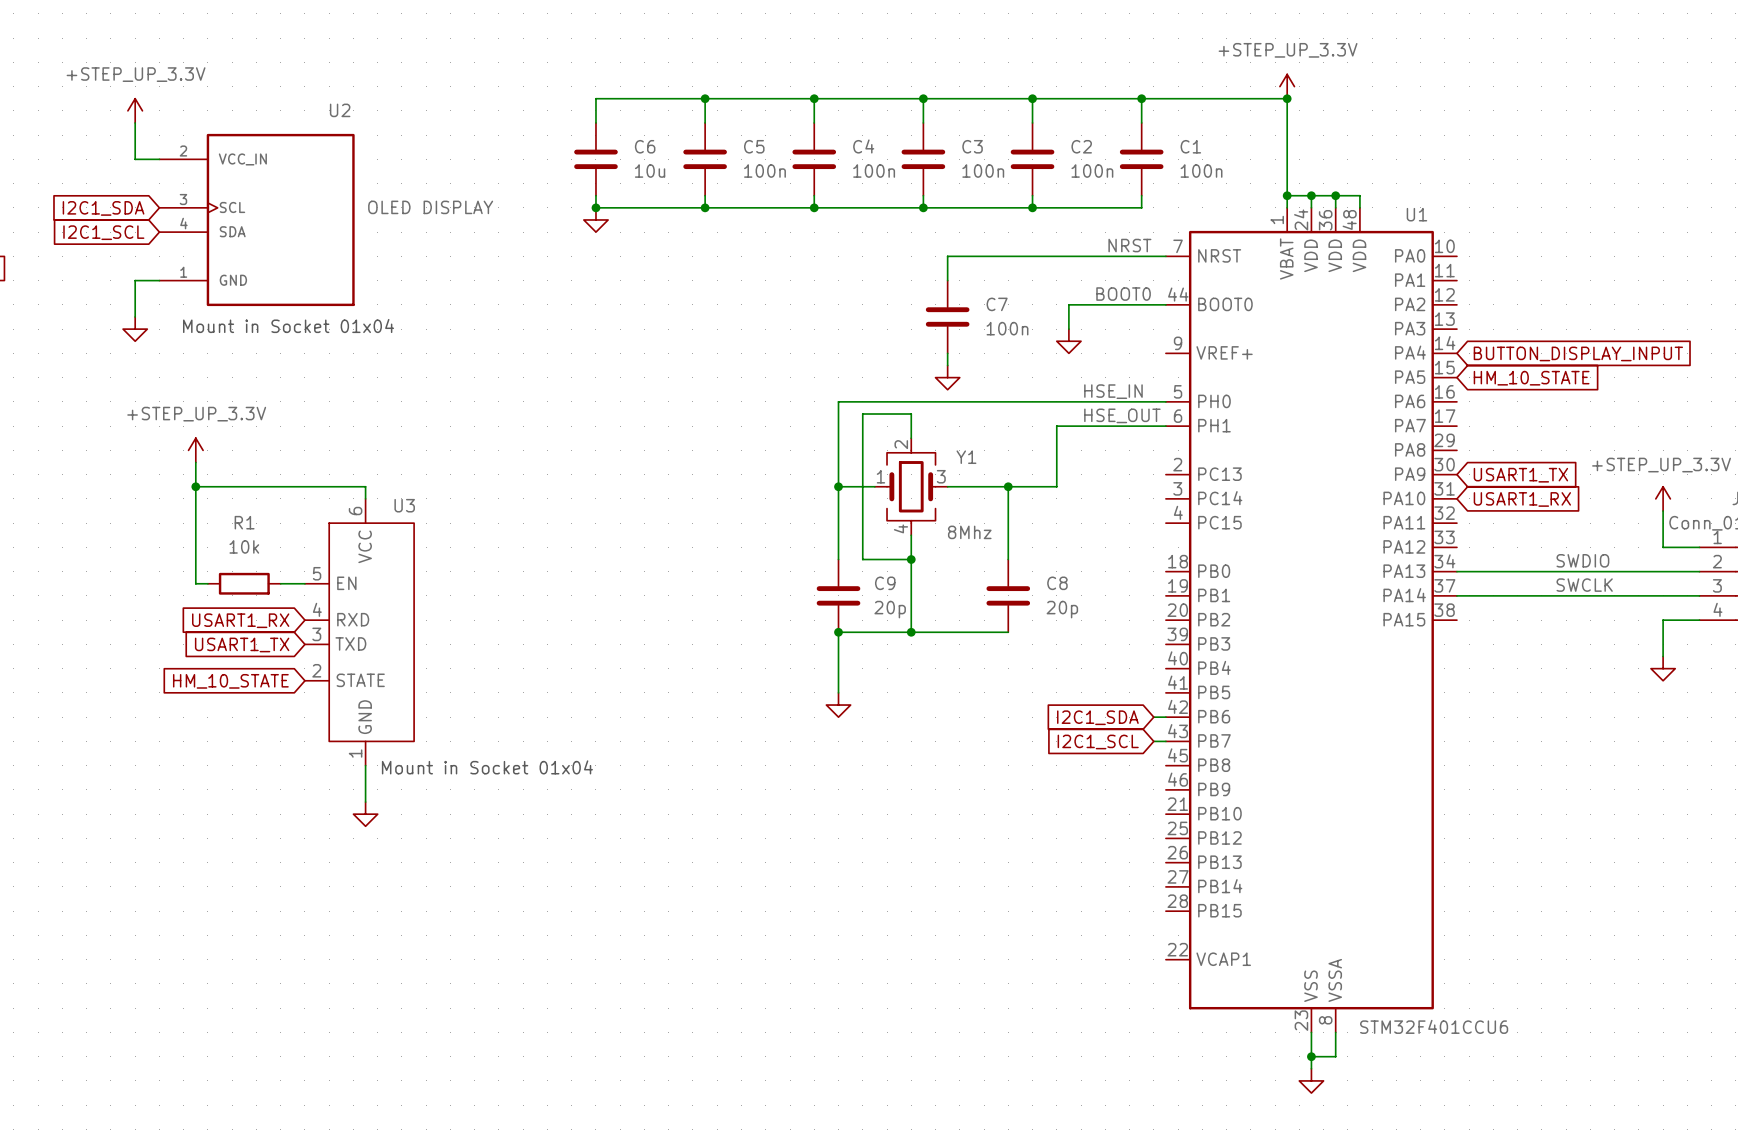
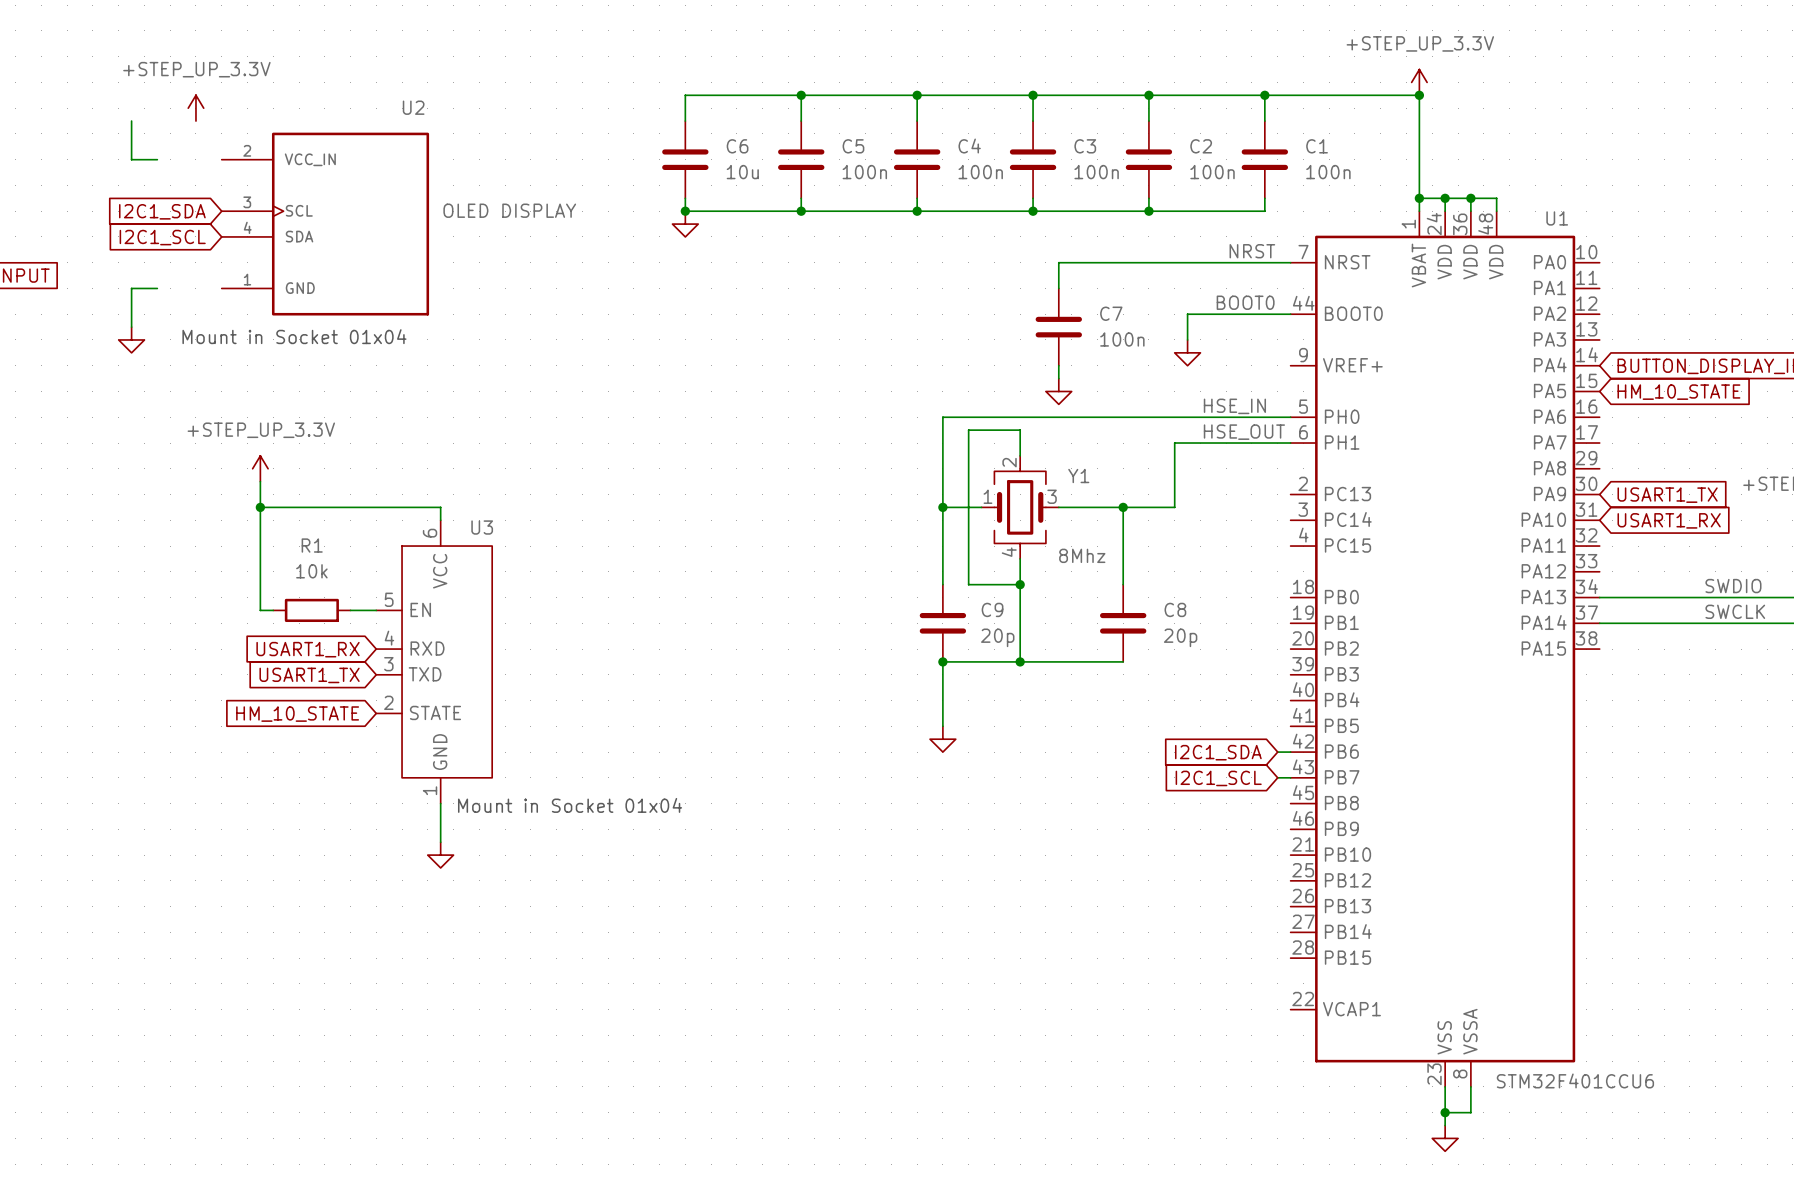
wire: (135, 122) (135, 159) (159, 159) -> (131, 121) (131, 159) (157, 159)
wire: (159, 280) (135, 280) (135, 316) -> (157, 288) (131, 288) (131, 327)
text position: Mount in Socket 01x04 (288, 325) -> Mount in Socket 01x04 (294, 336)
power symbol position: (135, 329) -> (131, 339)

